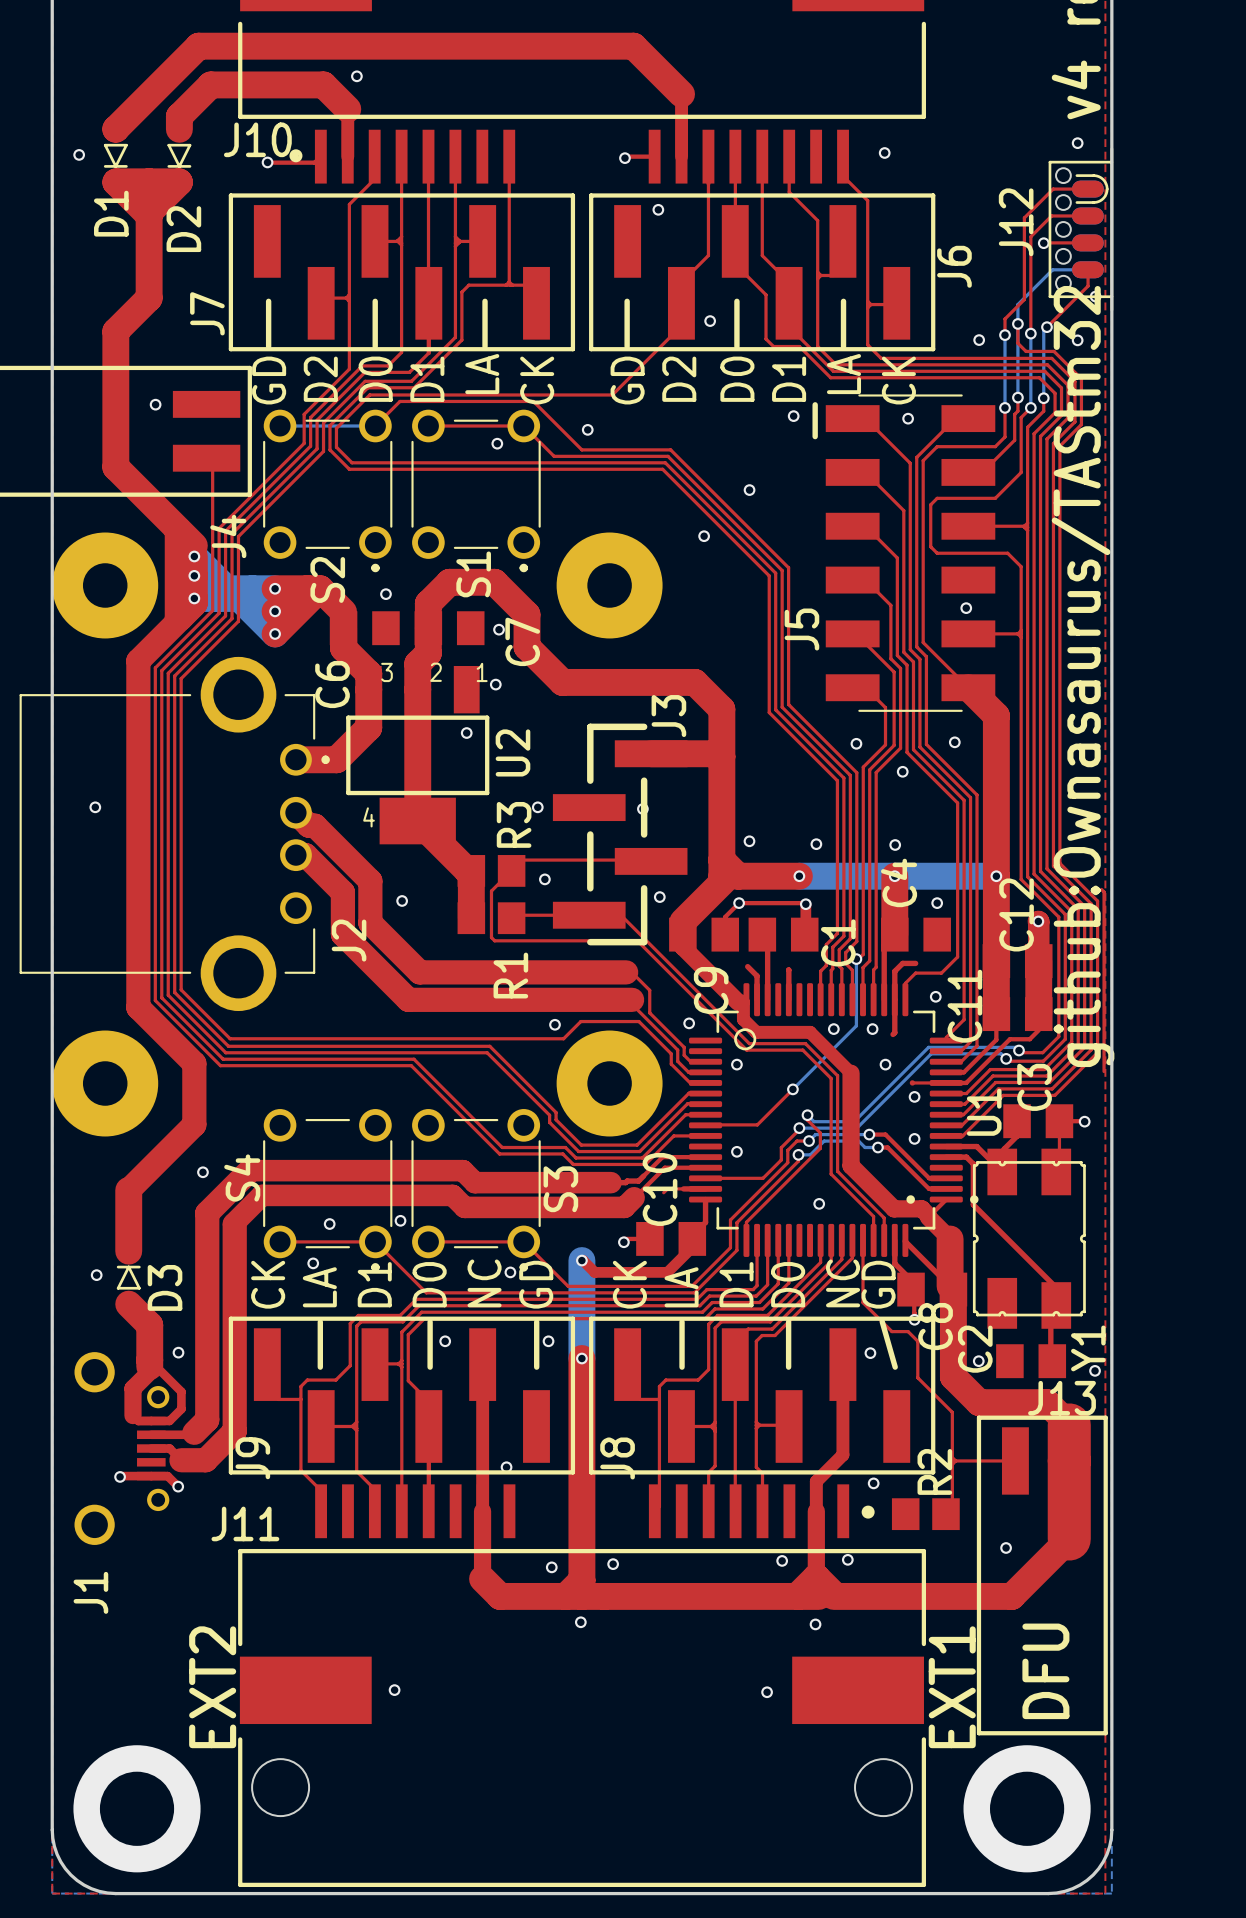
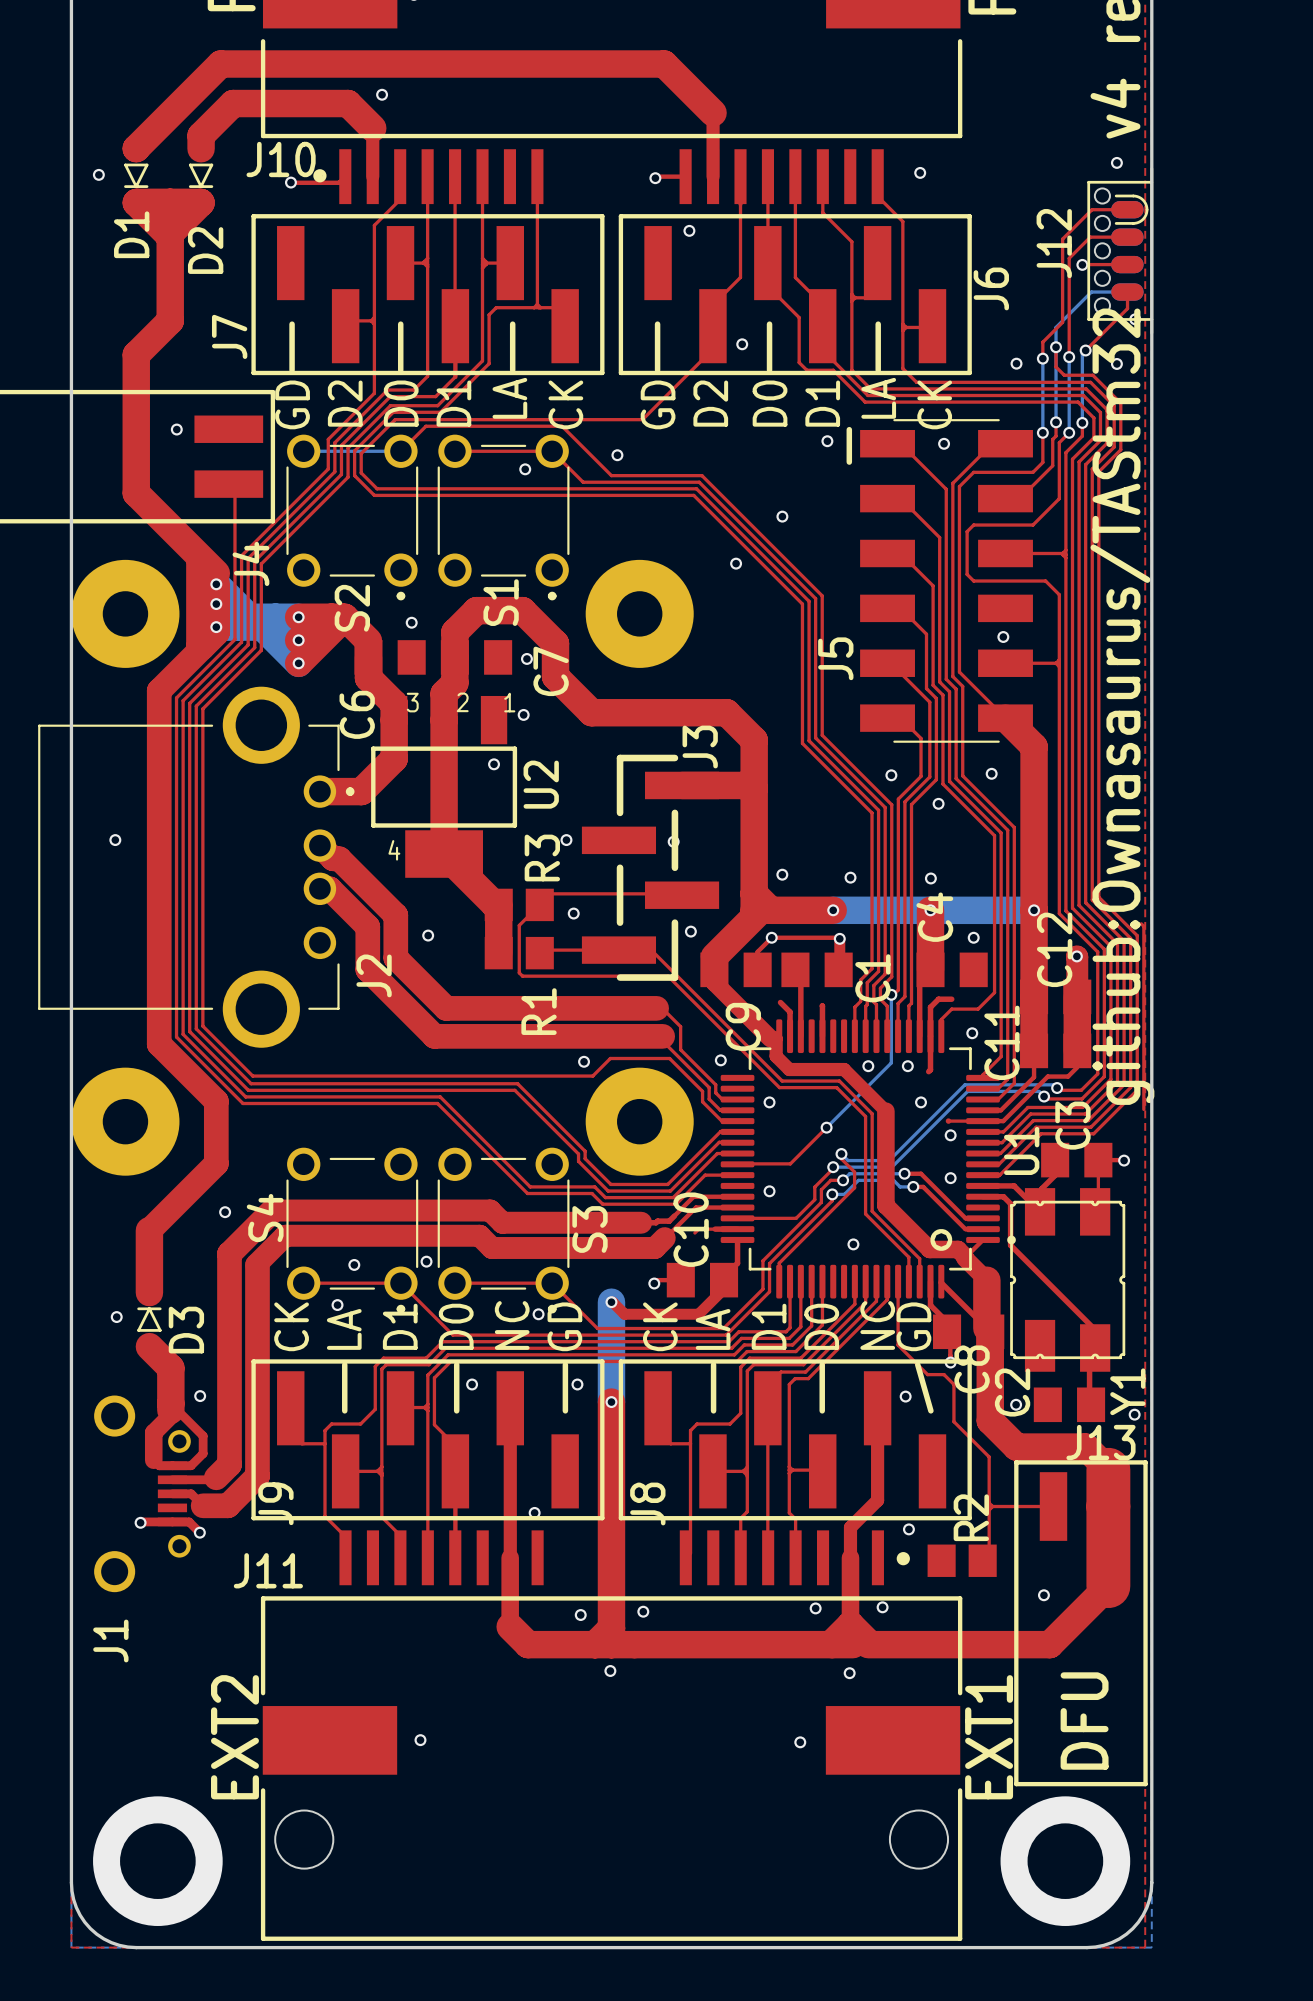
U1 footprint: [689, 983, 979, 1257] -> [720, 1019, 1016, 1299]

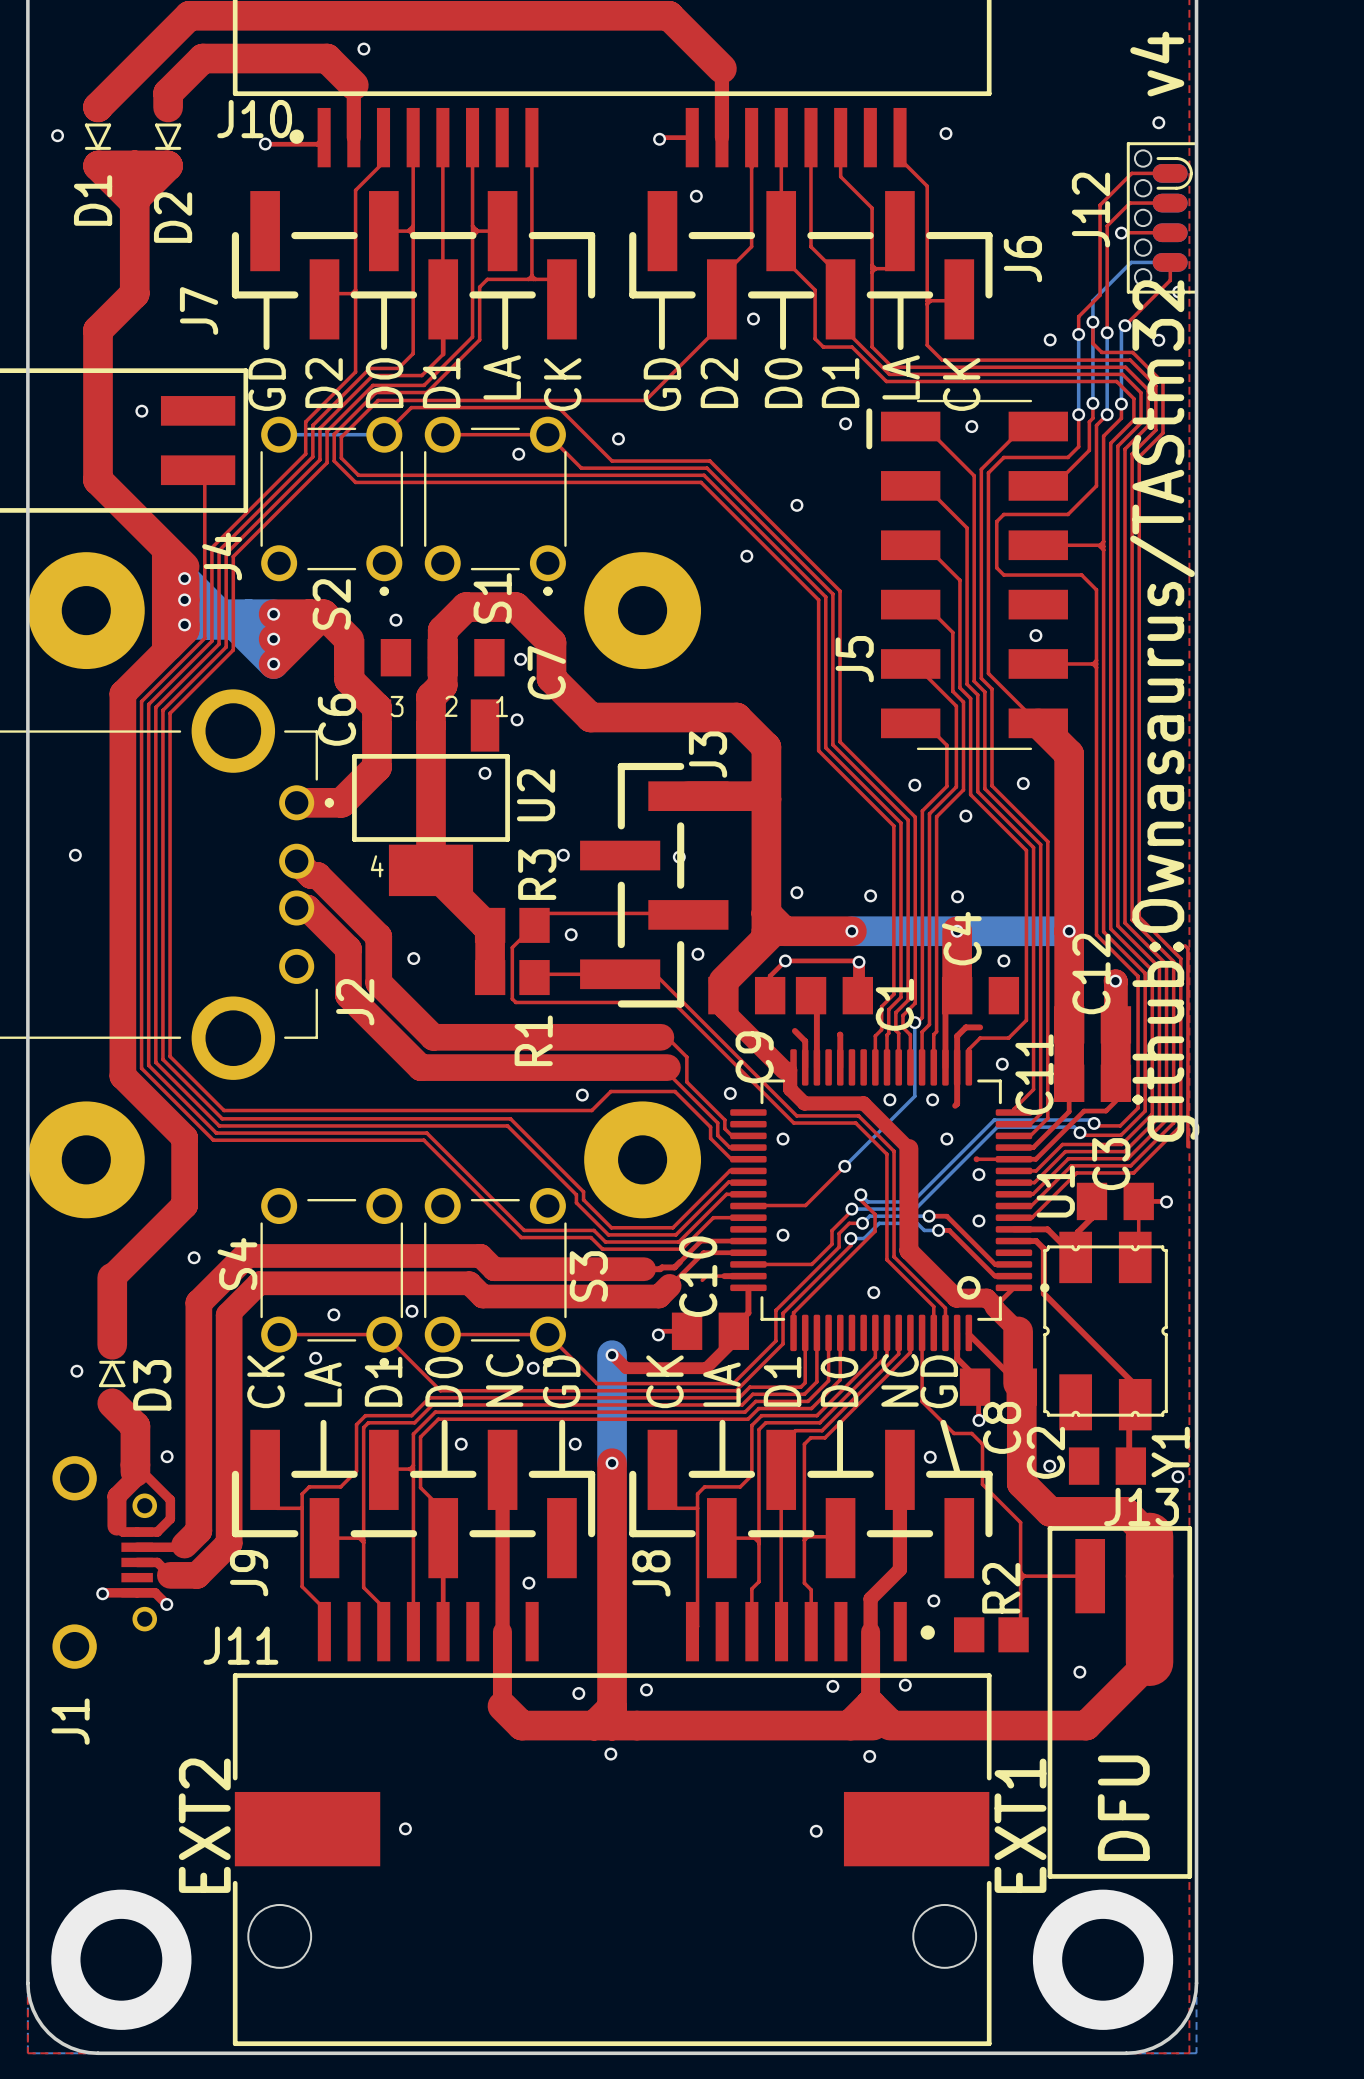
J7 footprint: [251, 214, 605, 376] -> [231, 191, 596, 340]
J6 footprint: [618, 214, 972, 376] -> [629, 191, 993, 340]
J9 footprint: [251, 1359, 605, 1521] -> [231, 1429, 596, 1579]
J8 footprint: [618, 1359, 972, 1521] -> [629, 1429, 993, 1579]

